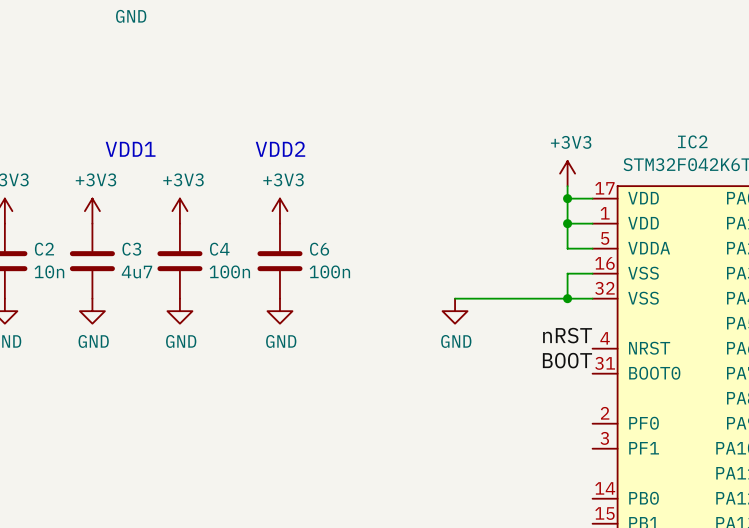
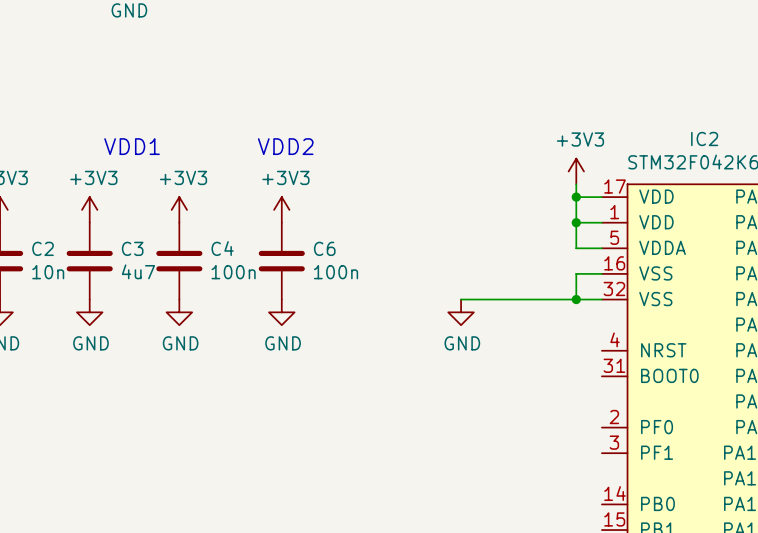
label: nRST (567, 335) -> none
label: BOOT (567, 360) -> none

